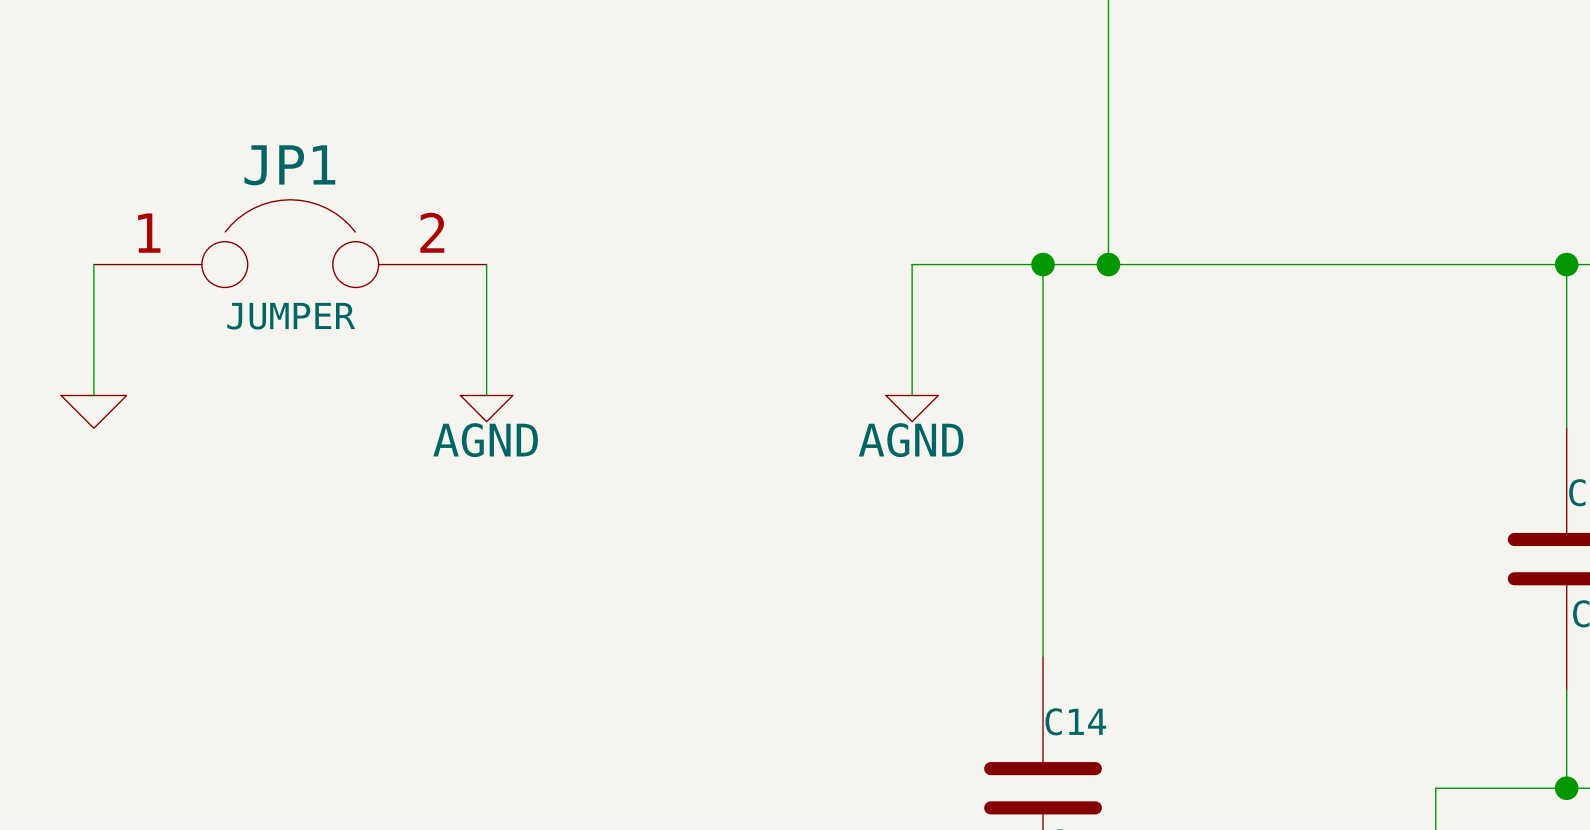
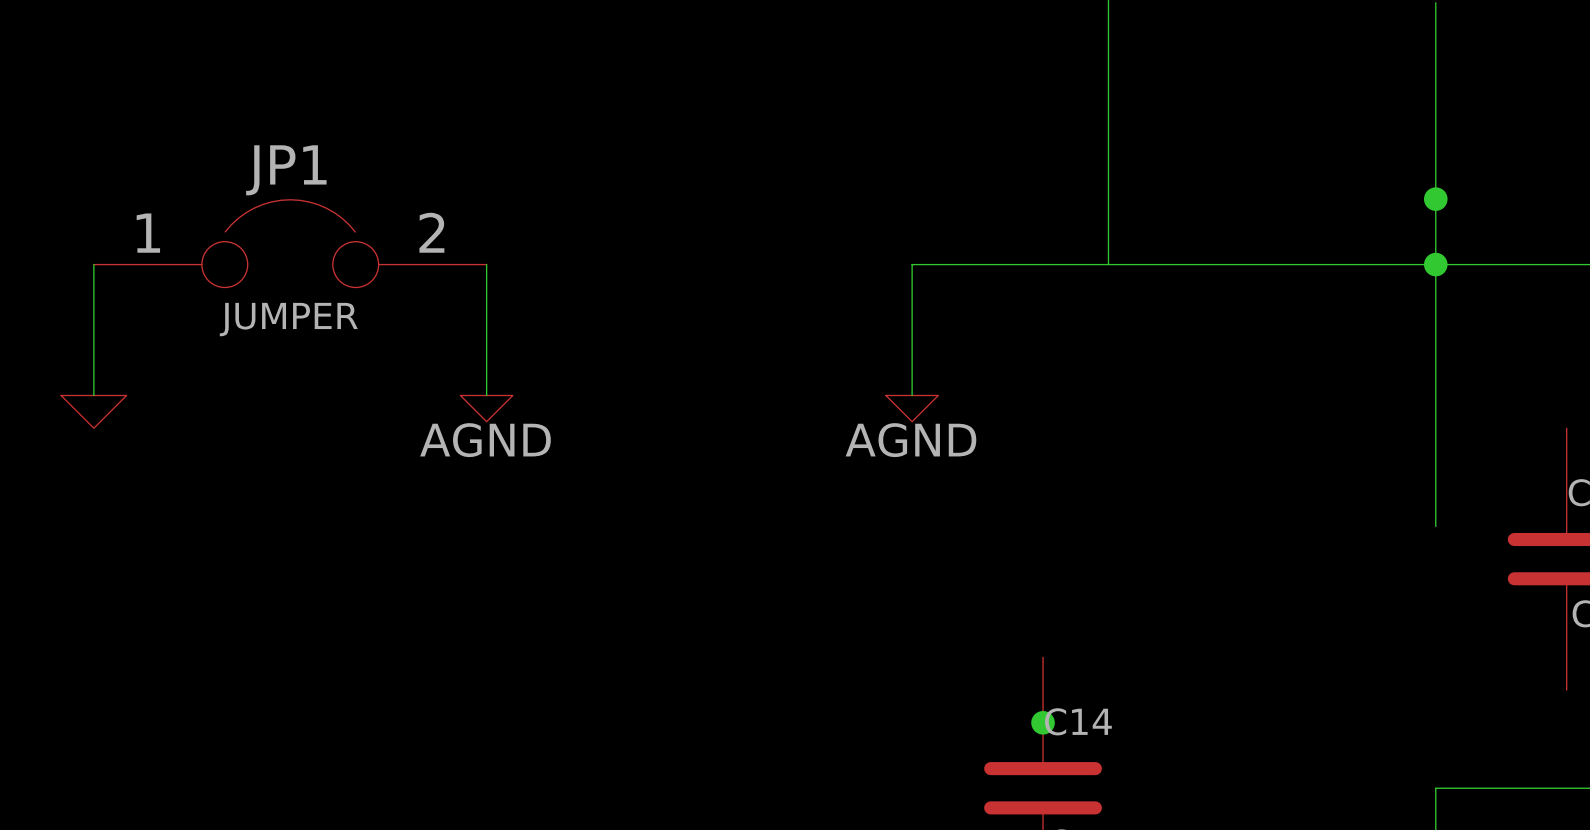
wire: none -> (1435, 2) (1435, 526)
junction: none -> (1435, 199)
wire: (1043, 264) (1043, 657) -> none
junction: (1043, 264) -> none
junction: (1108, 264) -> none
junction: none -> (1435, 264)
wire: (1566, 264) (1566, 428) -> none
junction: (1566, 264) -> none
wire: (1566, 690) (1566, 788) -> none
junction: none -> (1043, 722)
junction: (1566, 788) -> none

